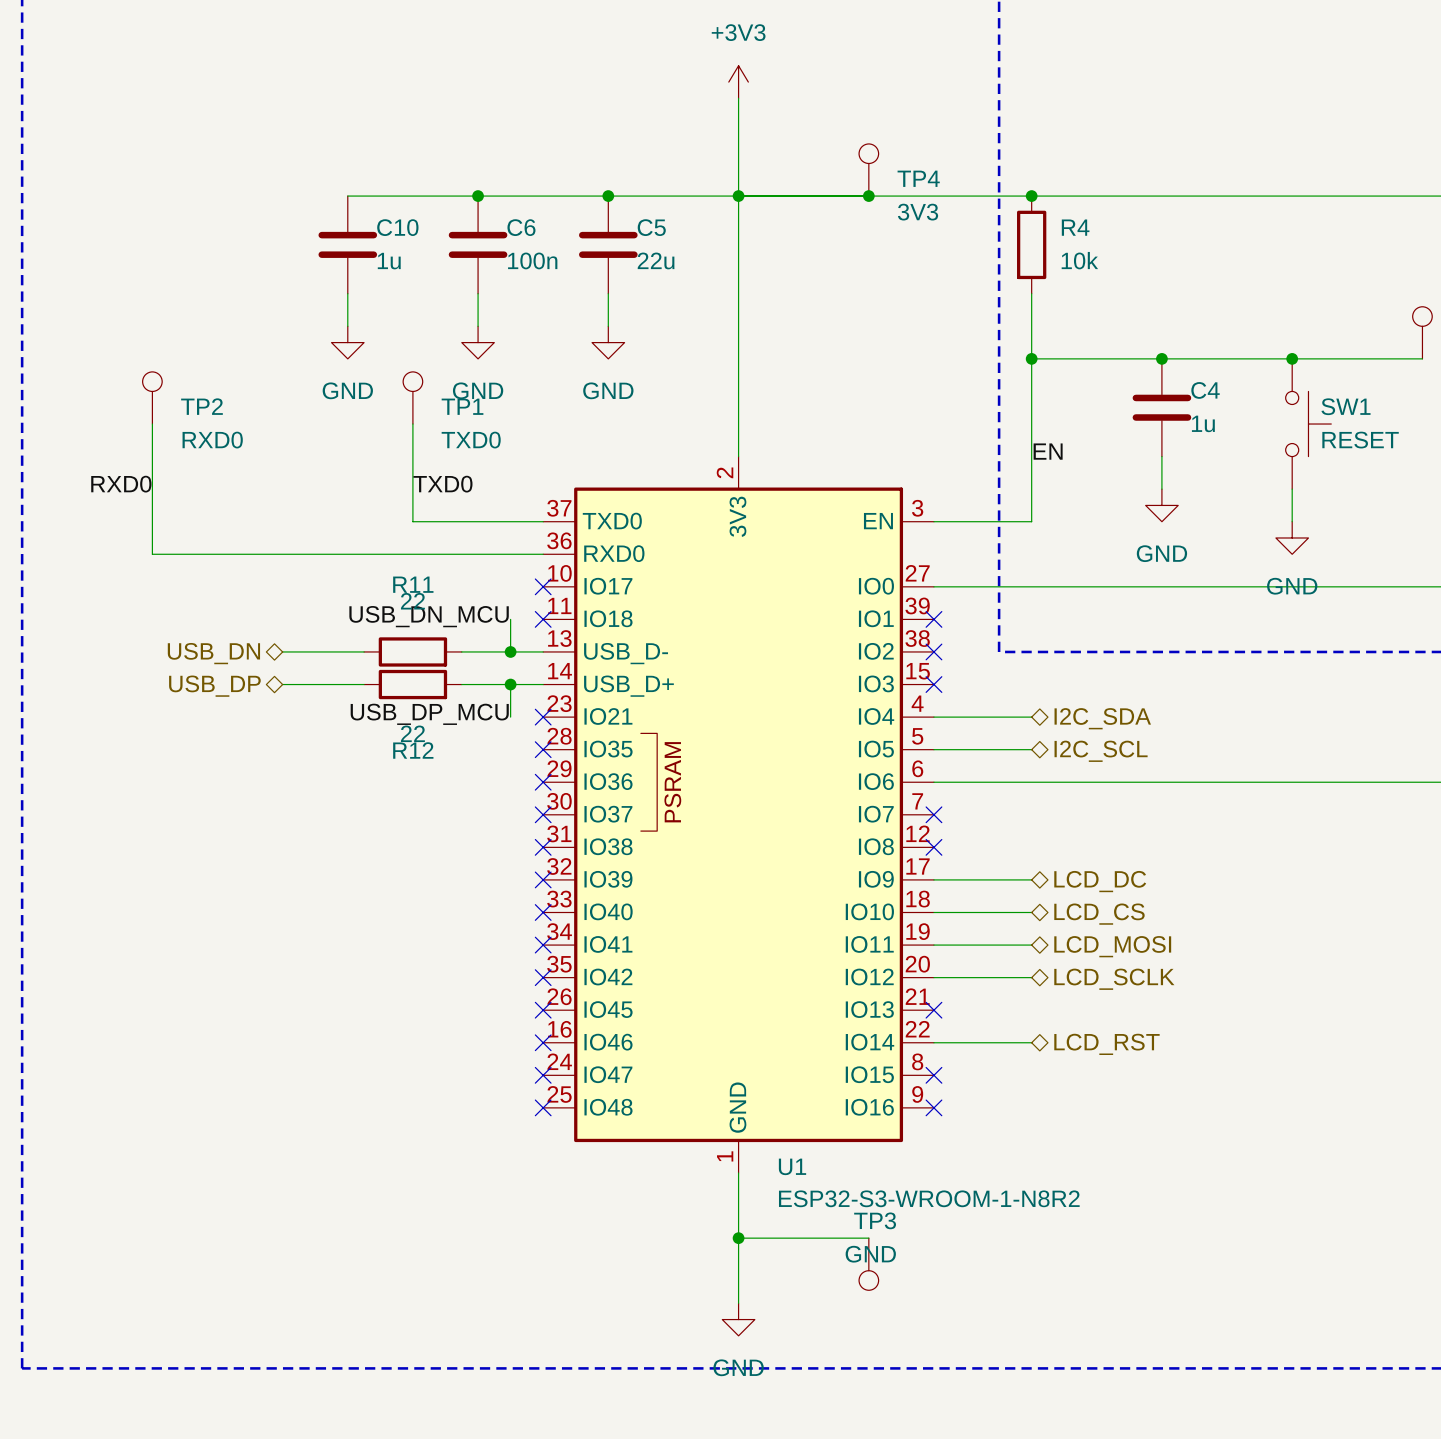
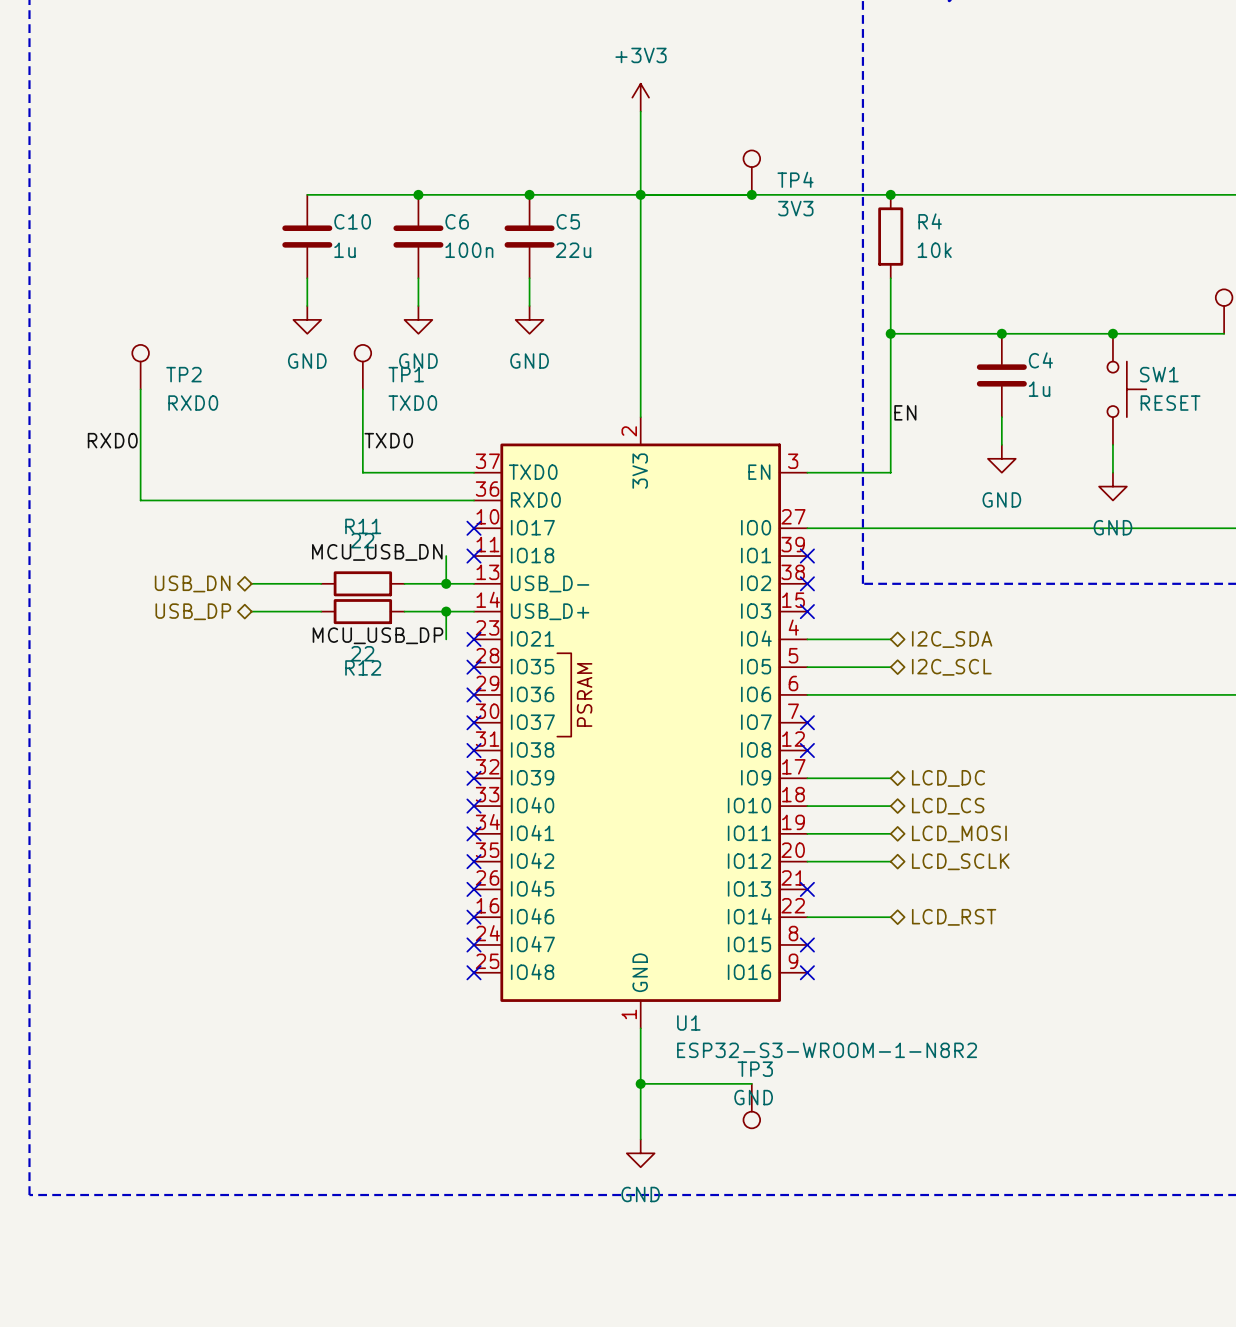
label: USB_DN_MCU (429, 616) -> MCU_USB_DN (377, 552)
label: USB_DP_MCU (429, 714) -> MCU_USB_DP (377, 635)

